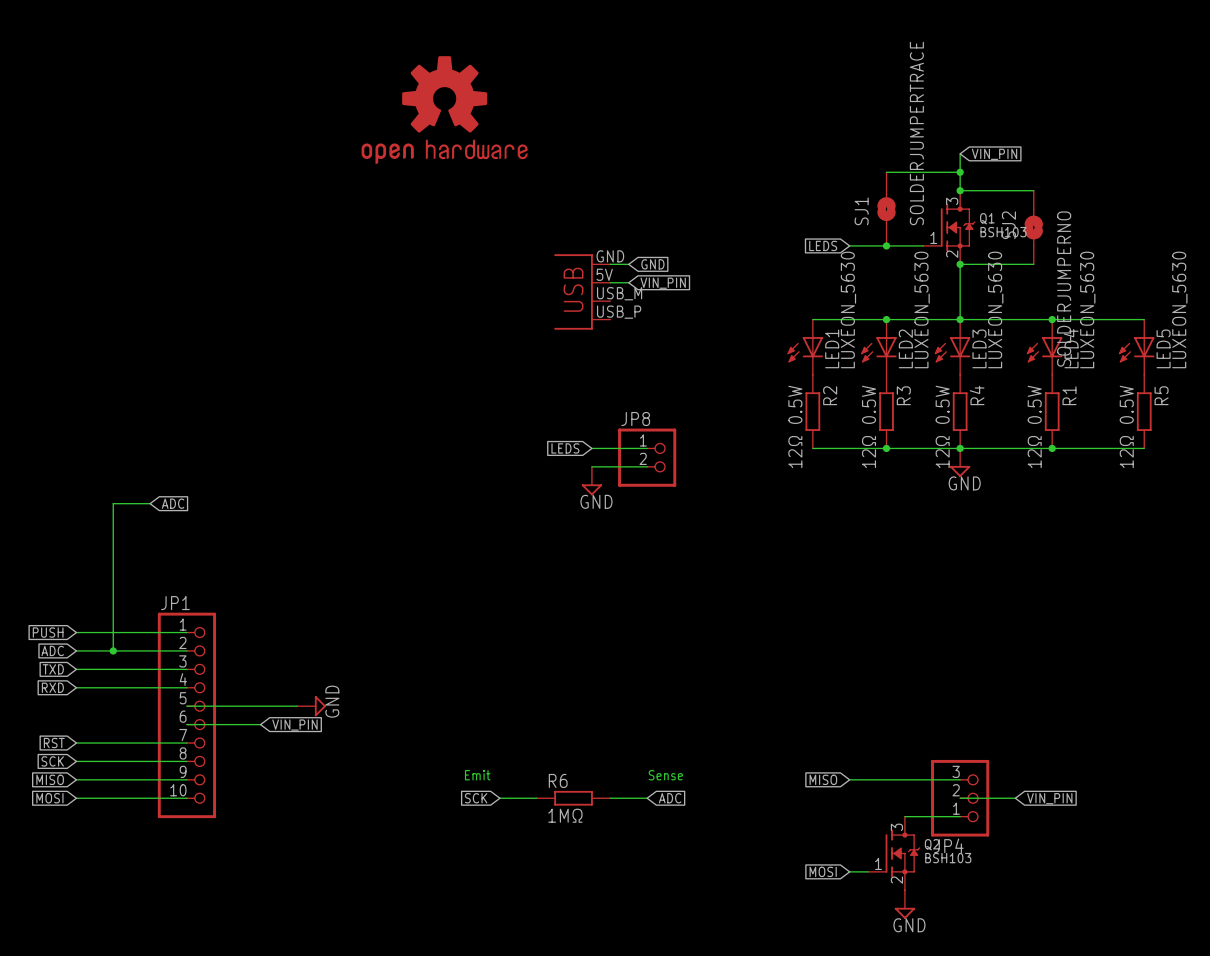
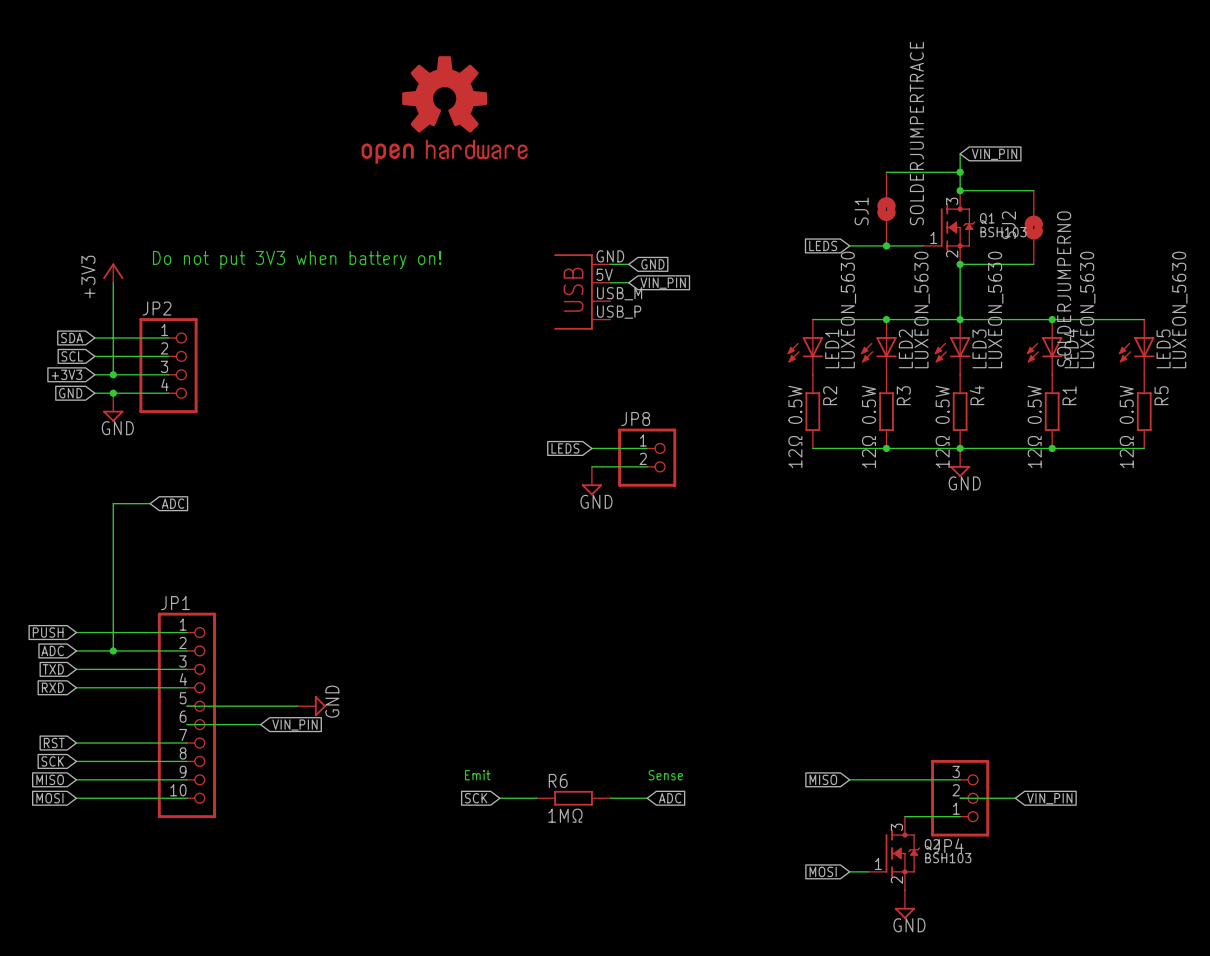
text: none -> Do not put 3V3 when battery on! (297, 260)
power symbol: none -> +3V3 (113, 273)
wire: none -> (113, 282) (113, 374)
global label: none -> SDA (72, 337)
wire: none -> (94, 337) (168, 337)
global label: none -> SCL (72, 356)
wire: none -> (94, 356) (168, 356)
JP2: none -> (168, 365)
global label: none -> +3V3 (66, 374)
wire: none -> (94, 374) (168, 374)
junction: none -> (113, 374)
global label: none -> GND (70, 393)
wire: none -> (94, 393) (168, 393)
junction: none -> (113, 393)
power symbol: none -> GND (113, 407)

